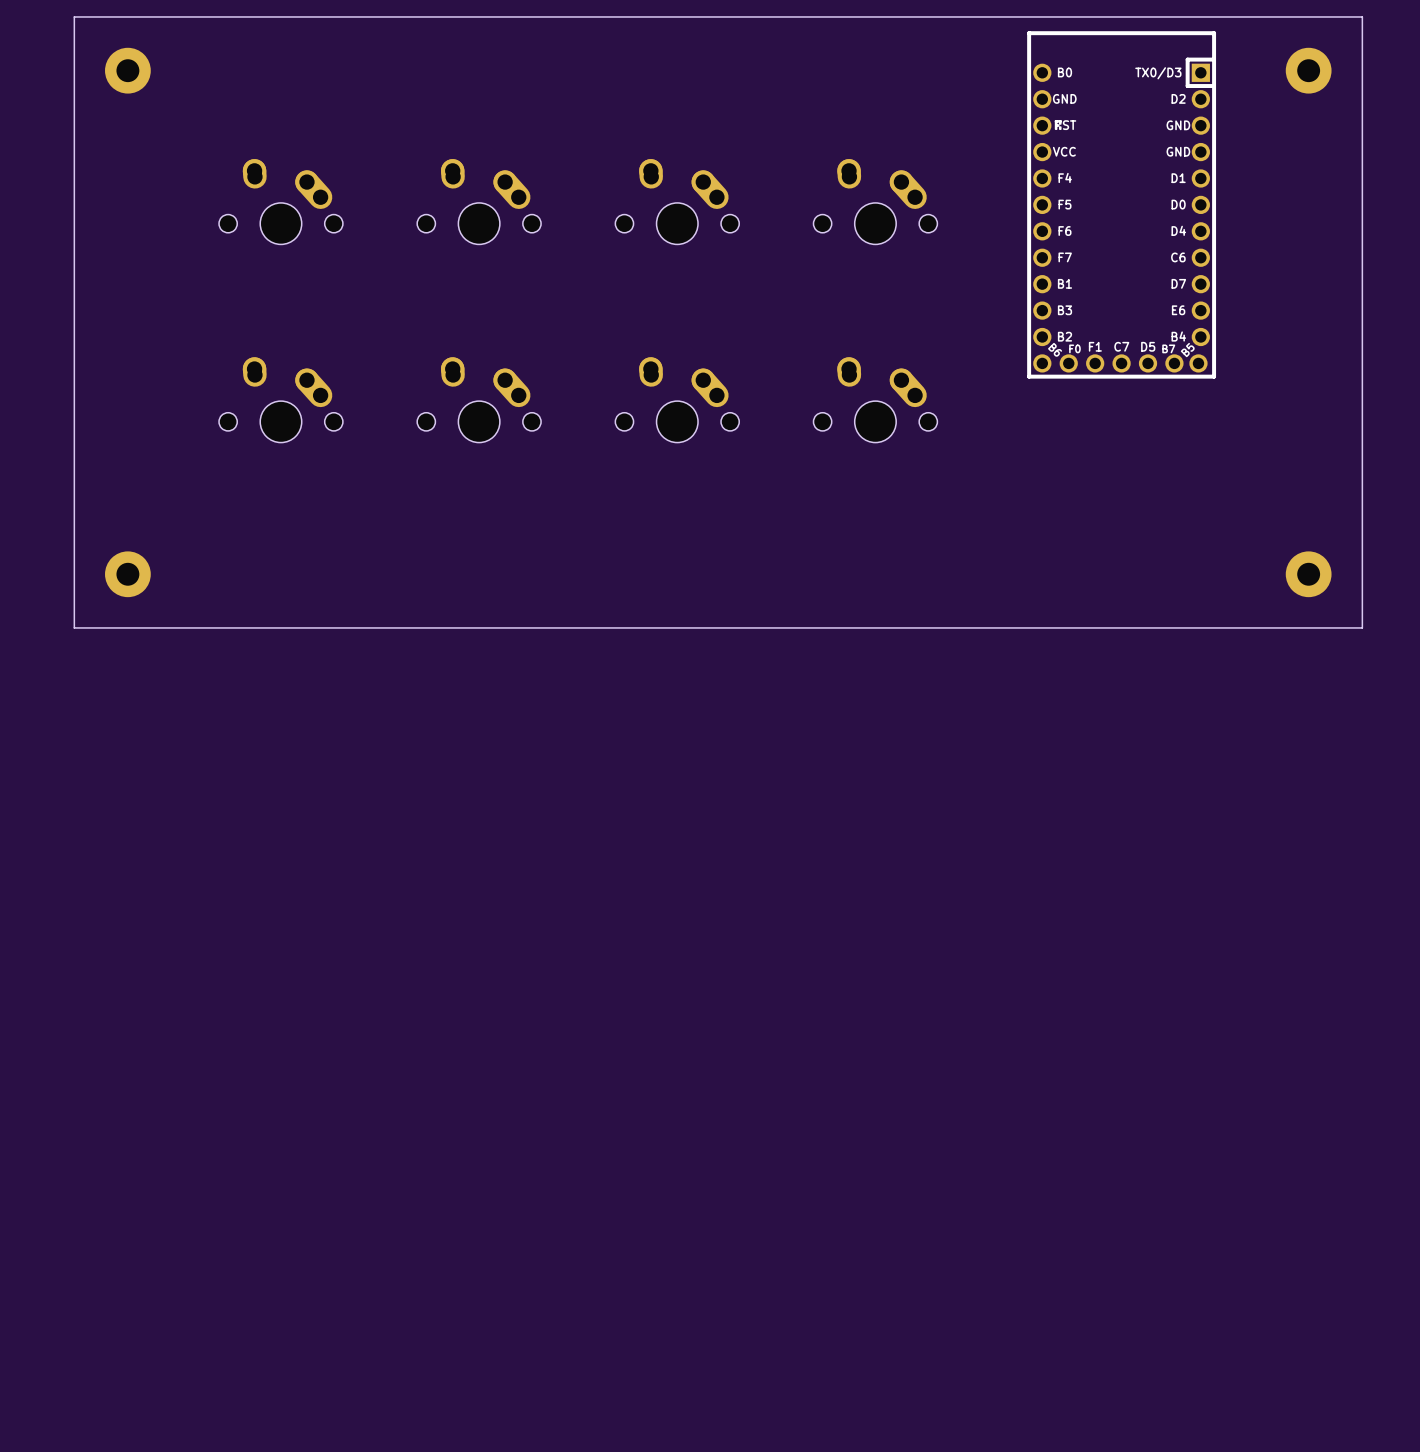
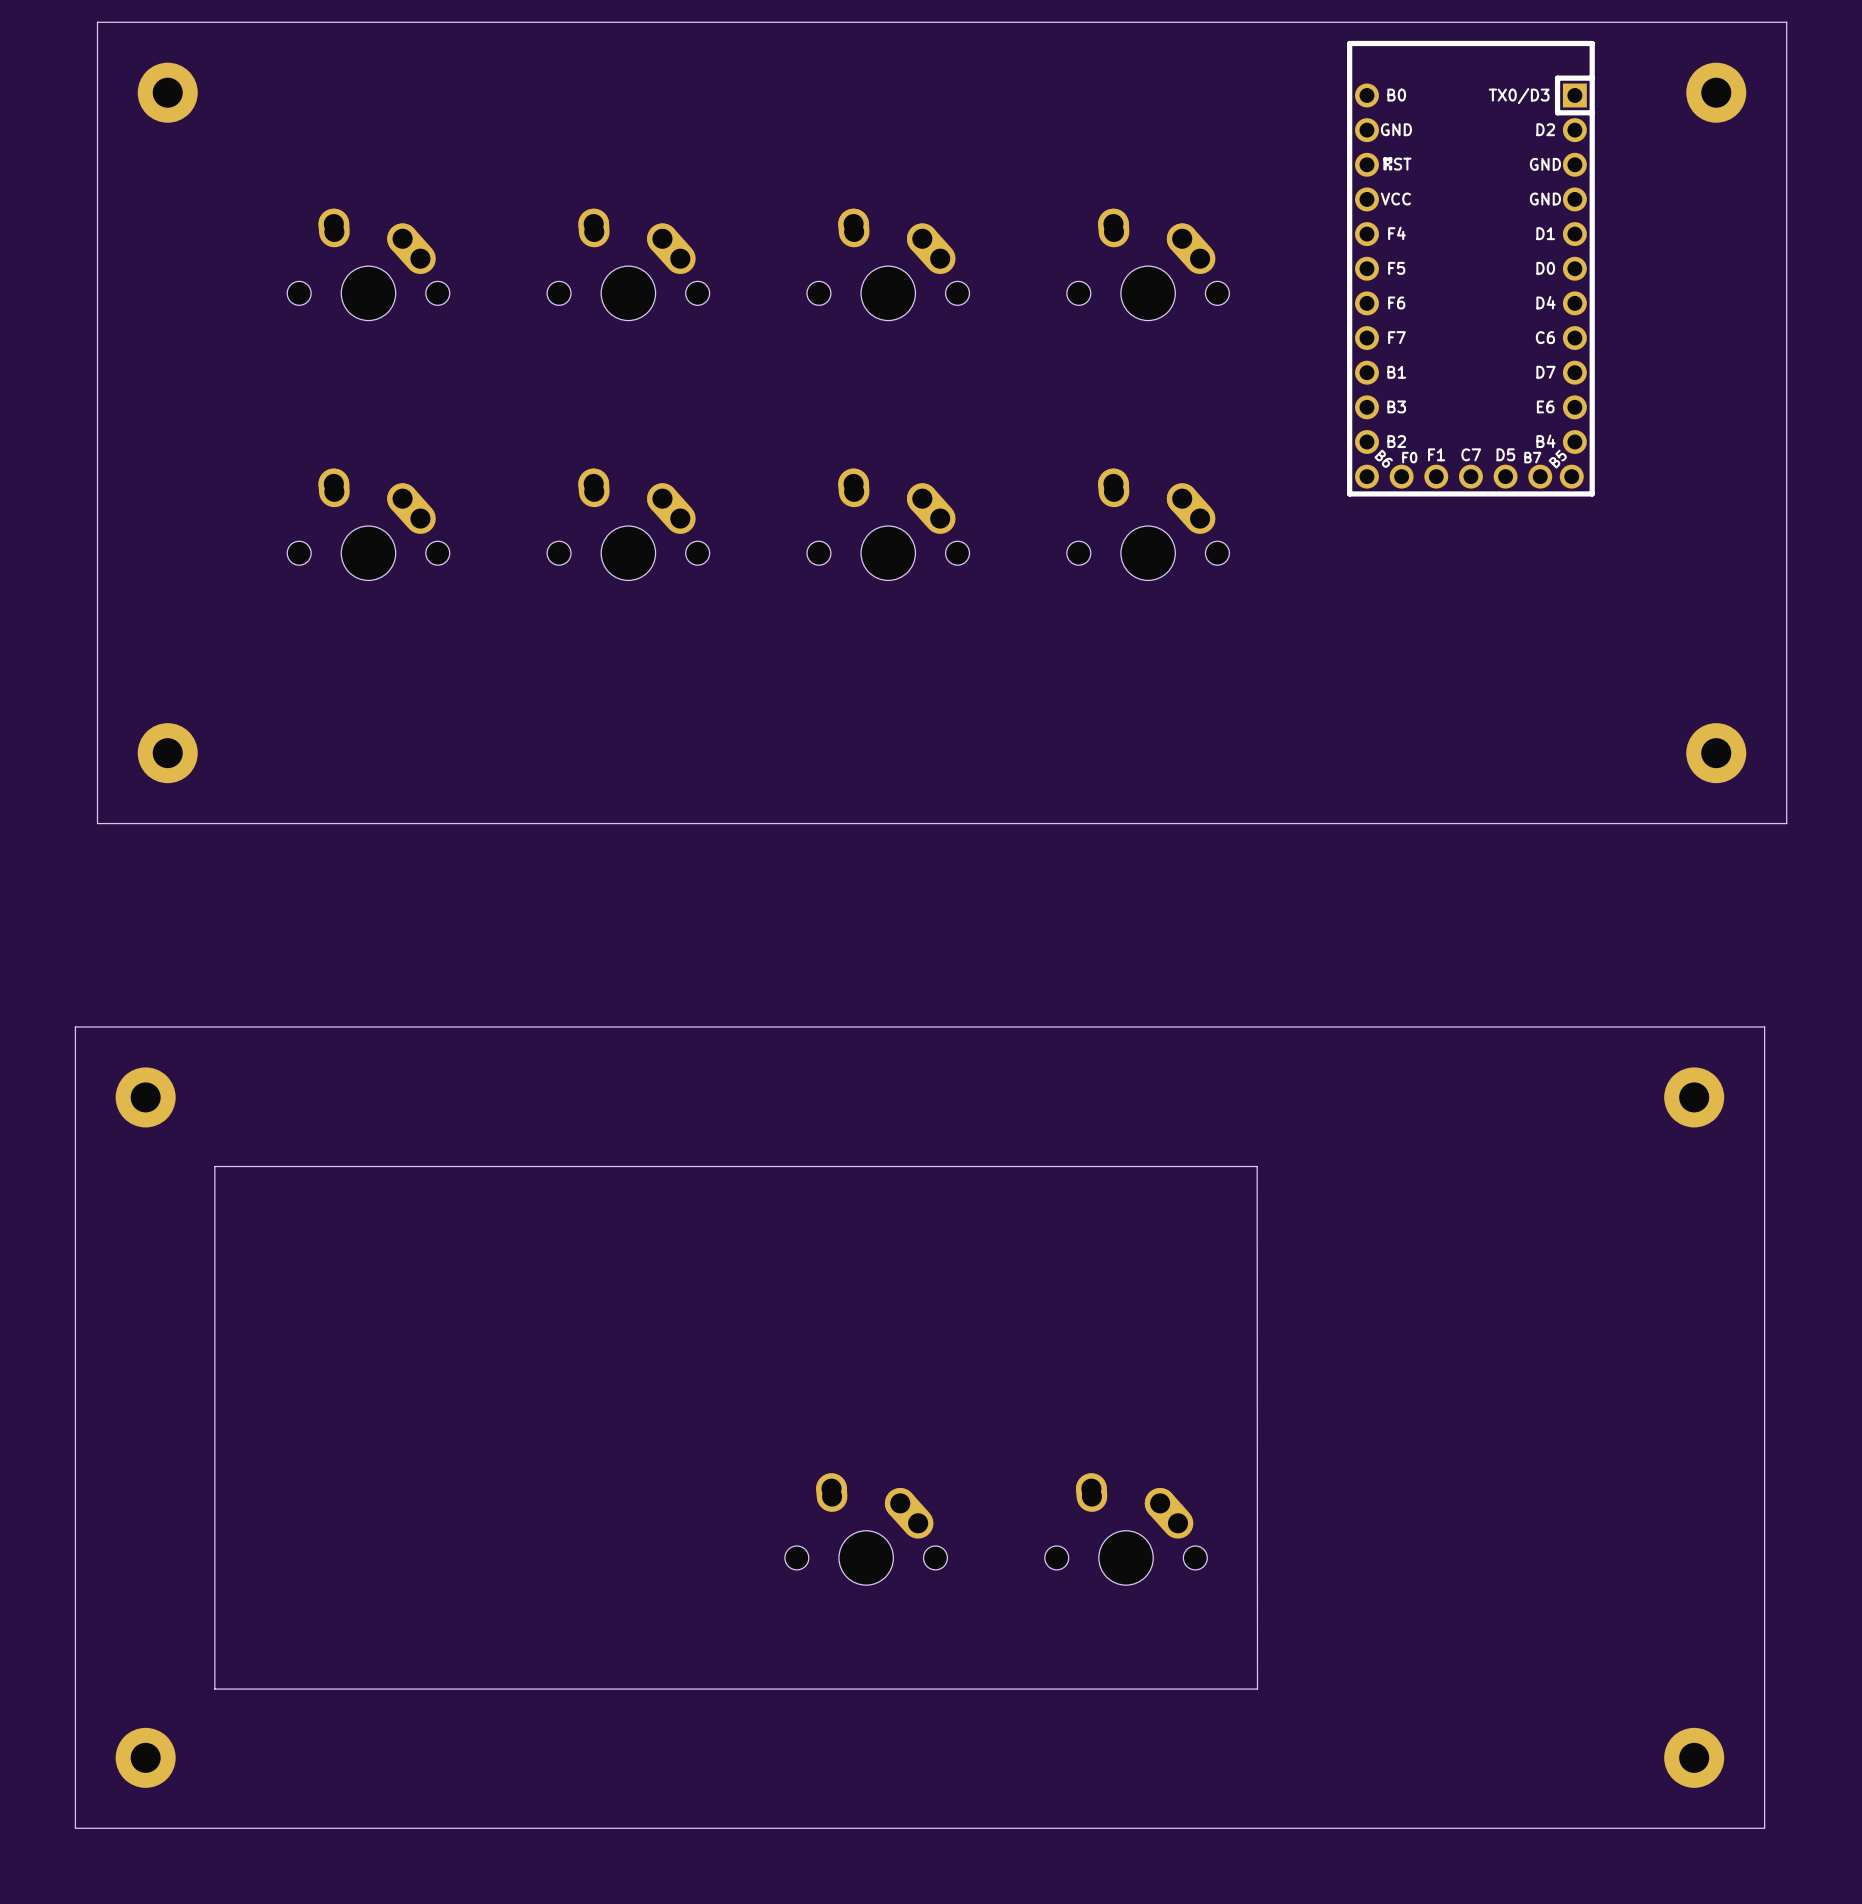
board edge: none -> (1764, 1027) (75, 1027) (75, 1828) (1764, 1828) (1764, 1027)
part: none -> (145, 1097)
part: none -> (1694, 1097)
board edge: none -> (1257, 1166) (214, 1166) (214, 1689) (1257, 1689) (1257, 1166)
part: none -> (866, 1529)
part: none -> (1126, 1529)
part: none -> (145, 1757)
part: none -> (1694, 1757)

